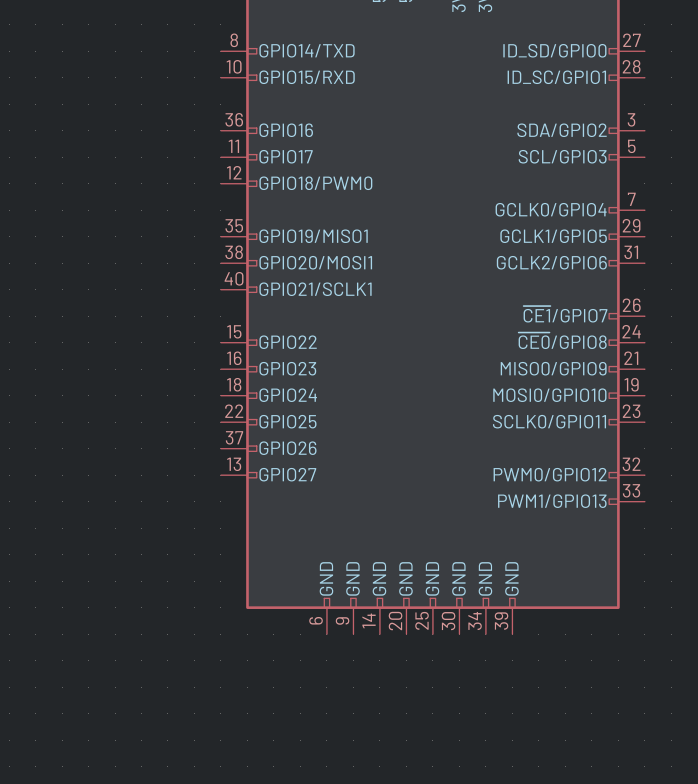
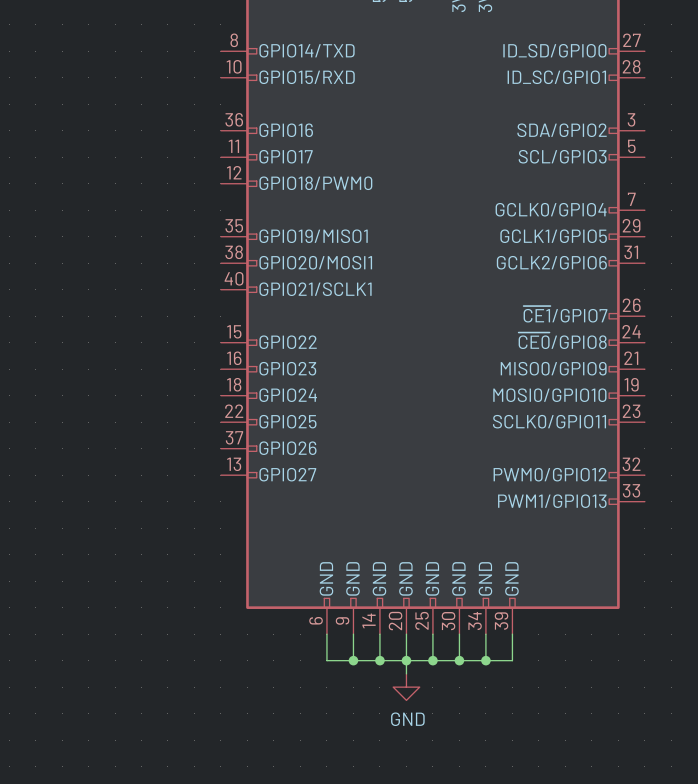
wire: none -> (326, 634) (326, 660) (512, 660) (512, 634)
wire: none -> (353, 634) (353, 660)
wire: none -> (379, 634) (379, 660)
wire: none -> (406, 634) (406, 673)
wire: none -> (432, 634) (432, 660)
wire: none -> (459, 634) (459, 660)
wire: none -> (485, 634) (485, 660)
junction: none -> (353, 660)
junction: none -> (379, 660)
junction: none -> (406, 660)
junction: none -> (432, 660)
junction: none -> (459, 660)
junction: none -> (485, 660)
power symbol: none -> GND (406, 687)

